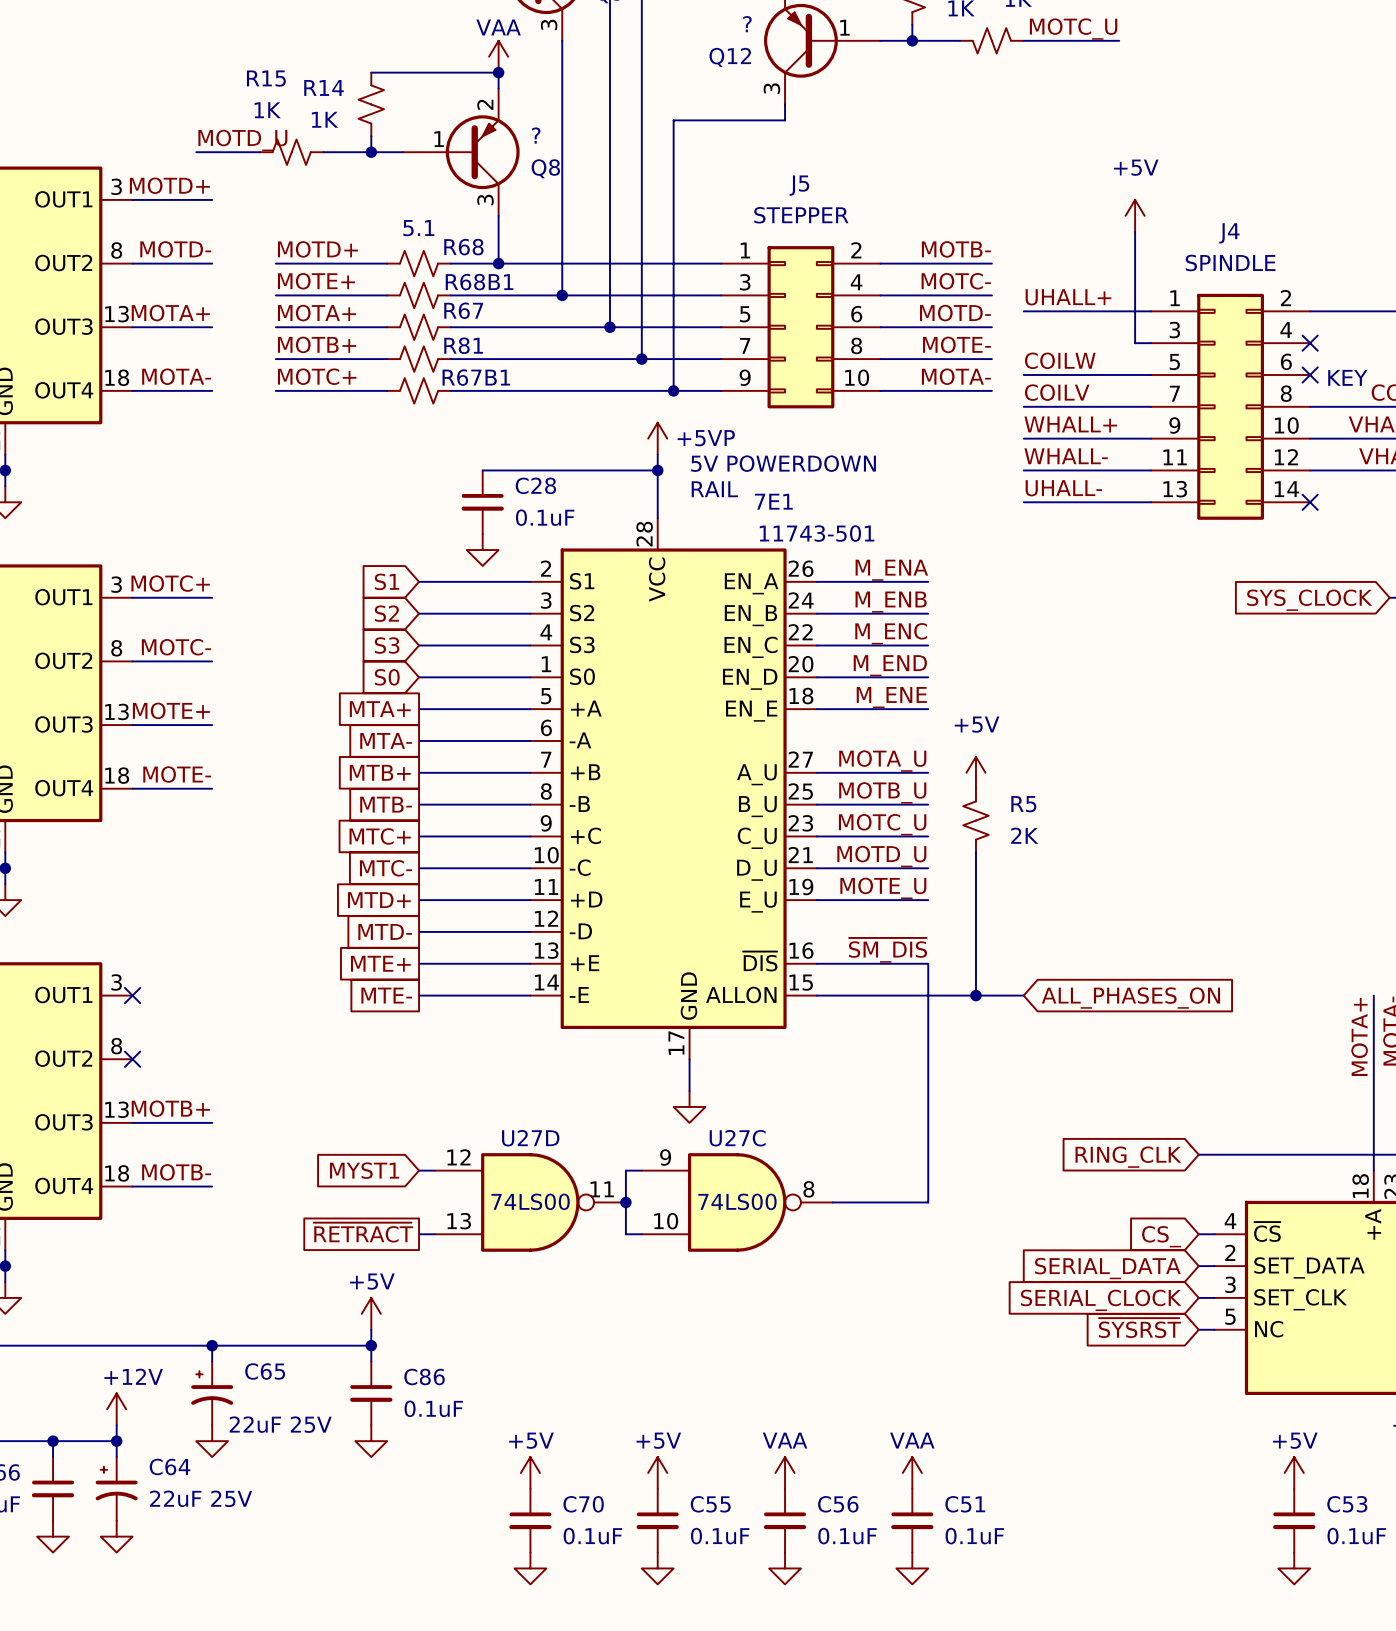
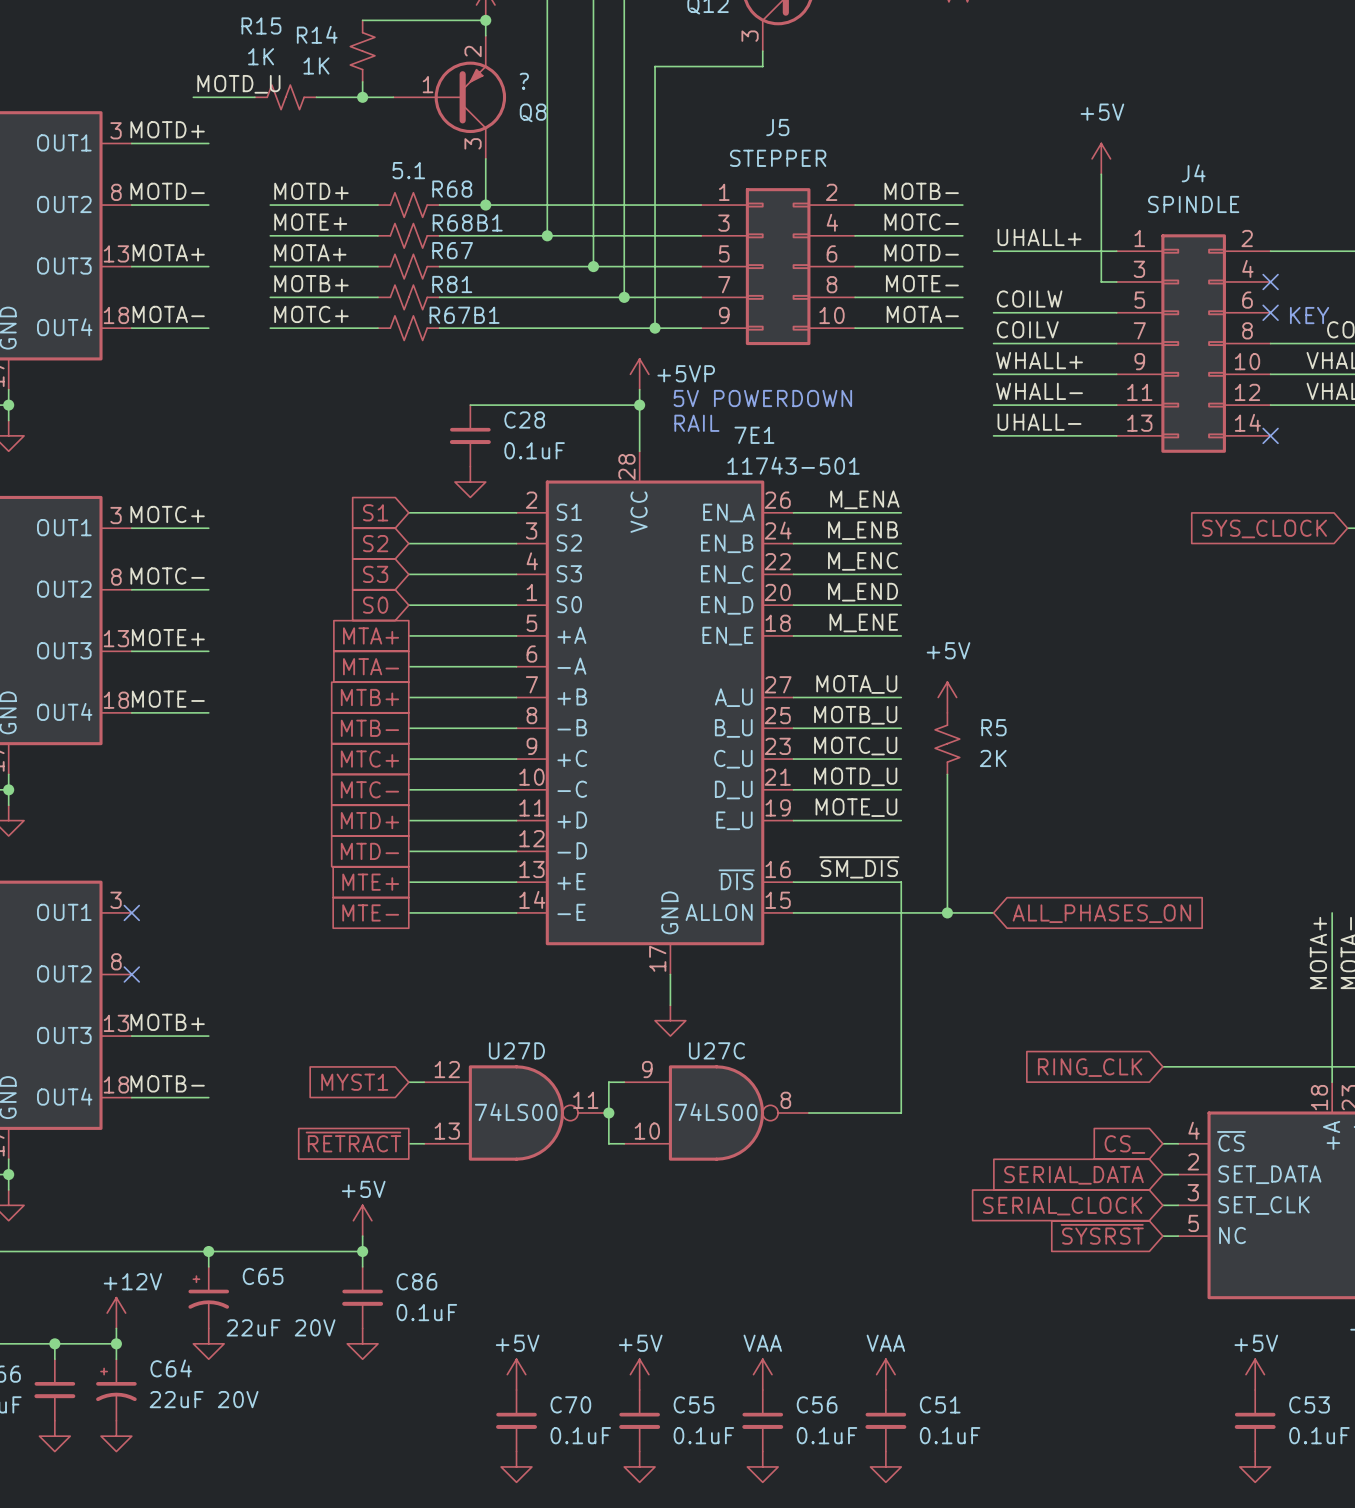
C65 value: 22uF 25V (280, 1424) -> 22uF 20V (281, 1327)
C64 value: 22uF 25V (201, 1498) -> 22uF 20V (204, 1399)

